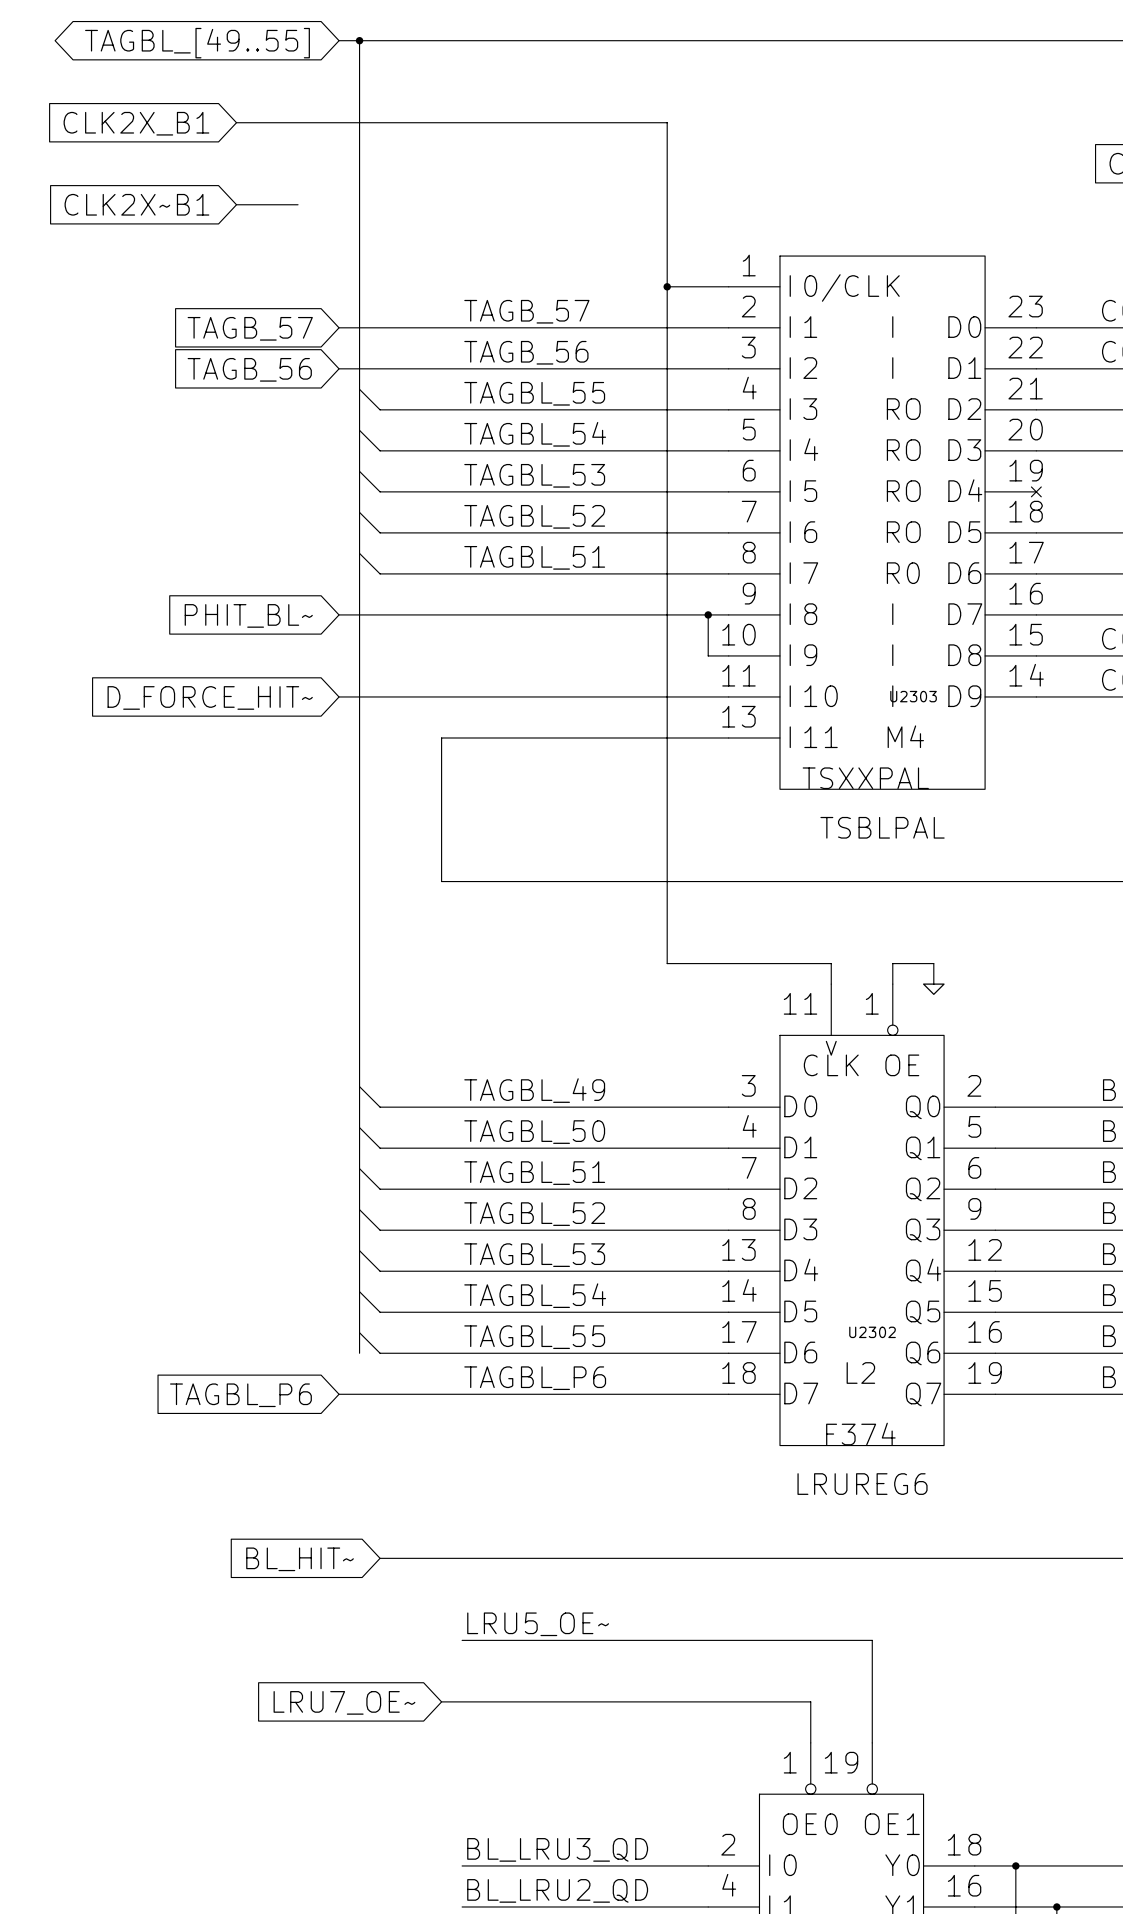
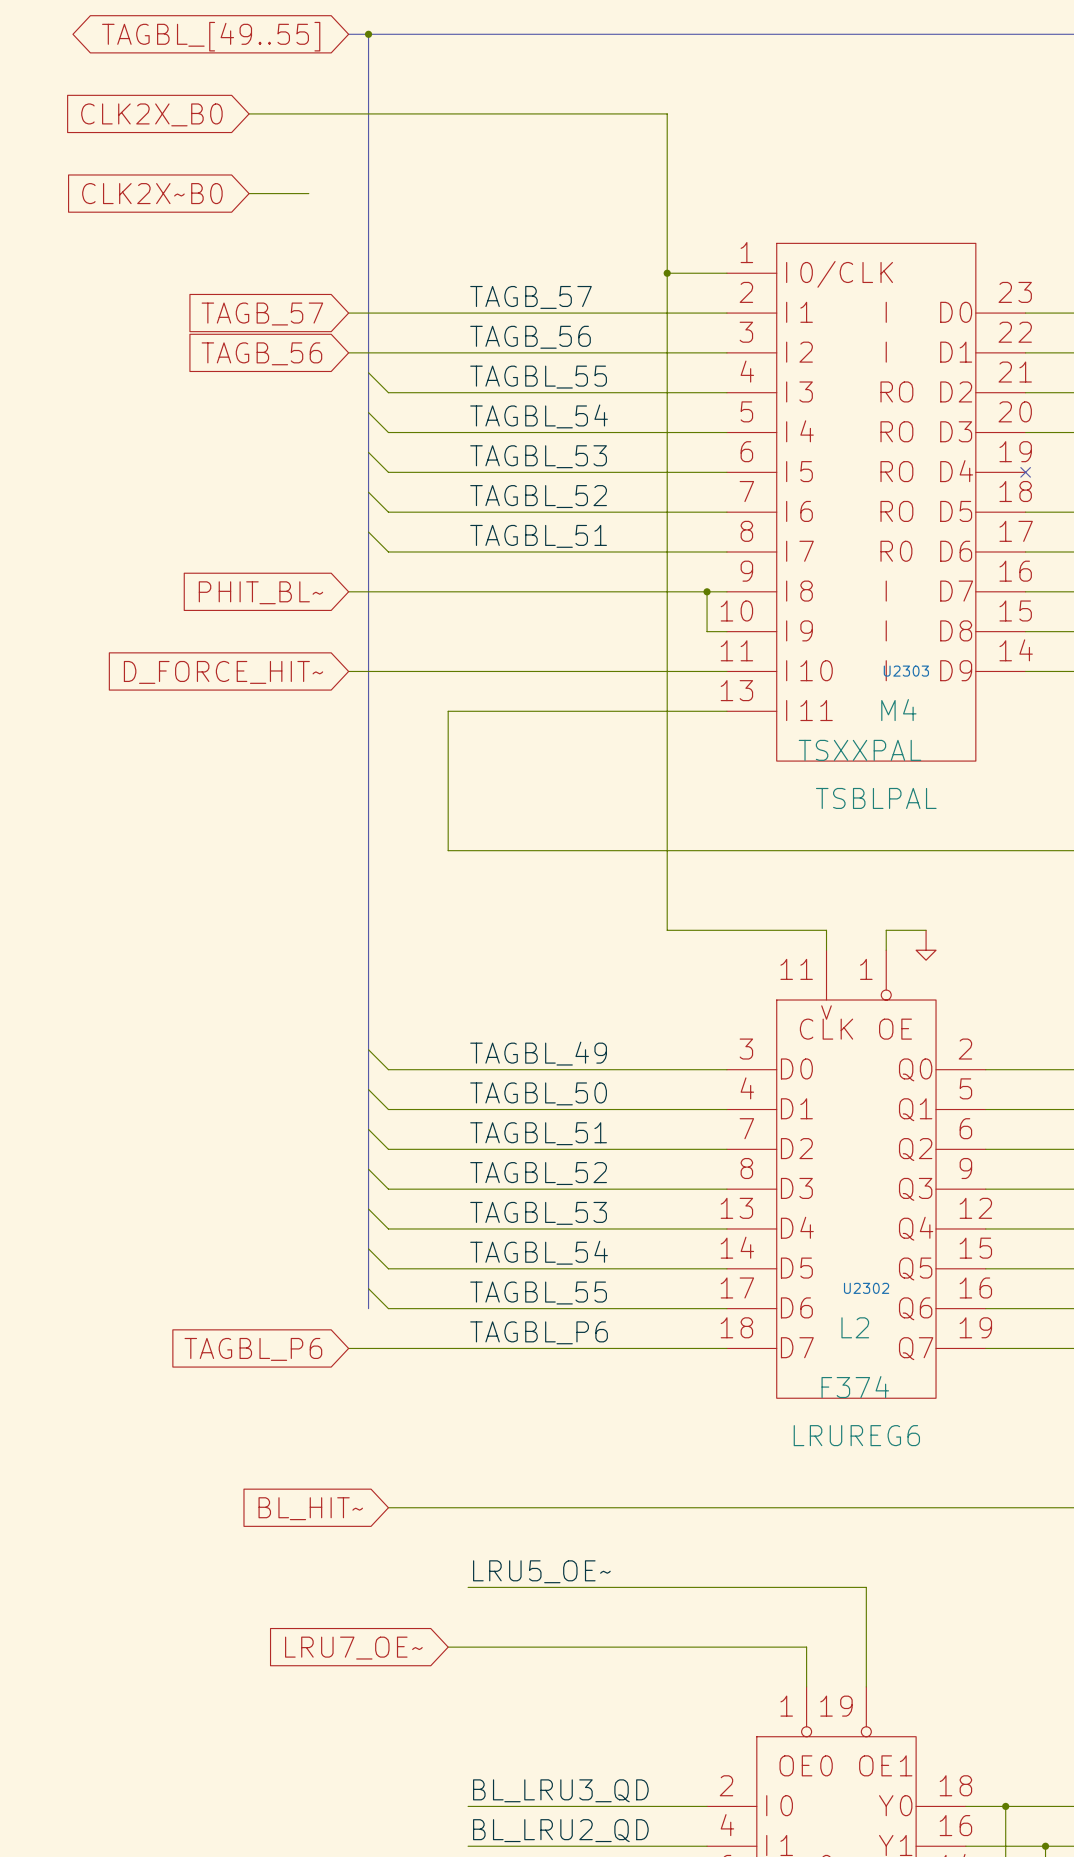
global label: CLK2X_B1 (136, 123) -> CLK2X_B0 (151, 114)
global label: CLK2X~B1 (136, 204) -> CLK2X~B0 (152, 193)

